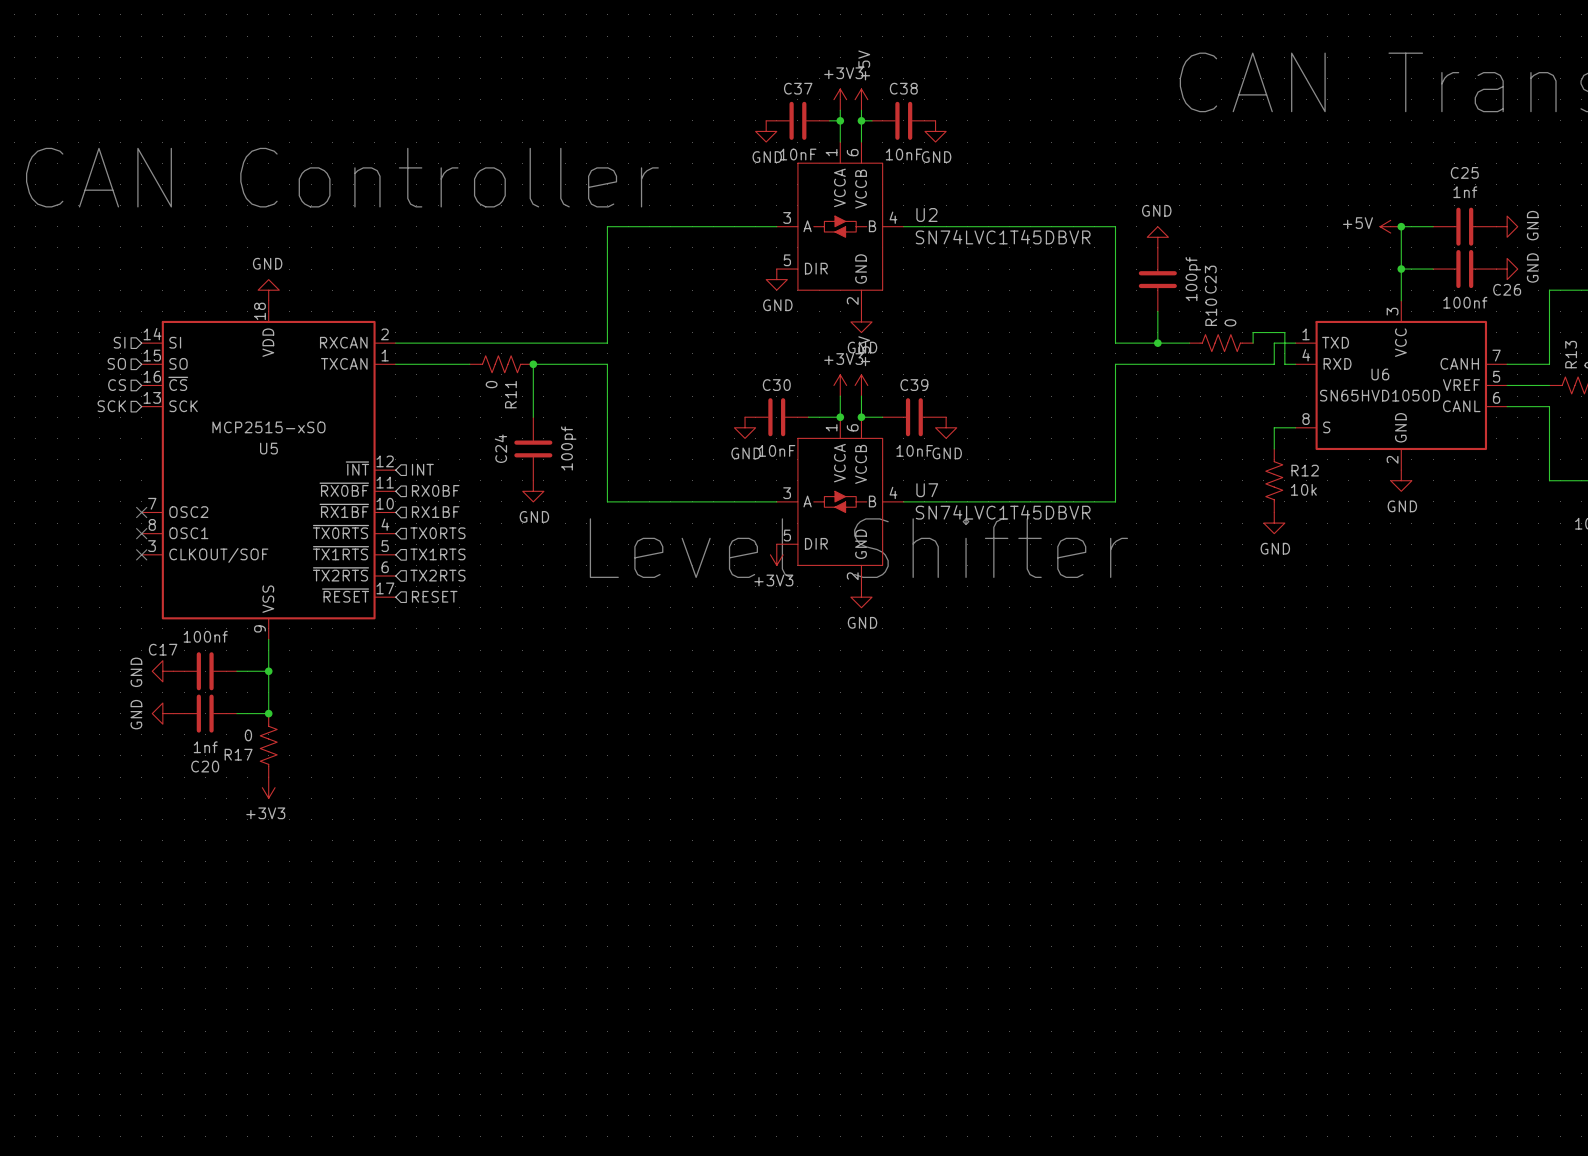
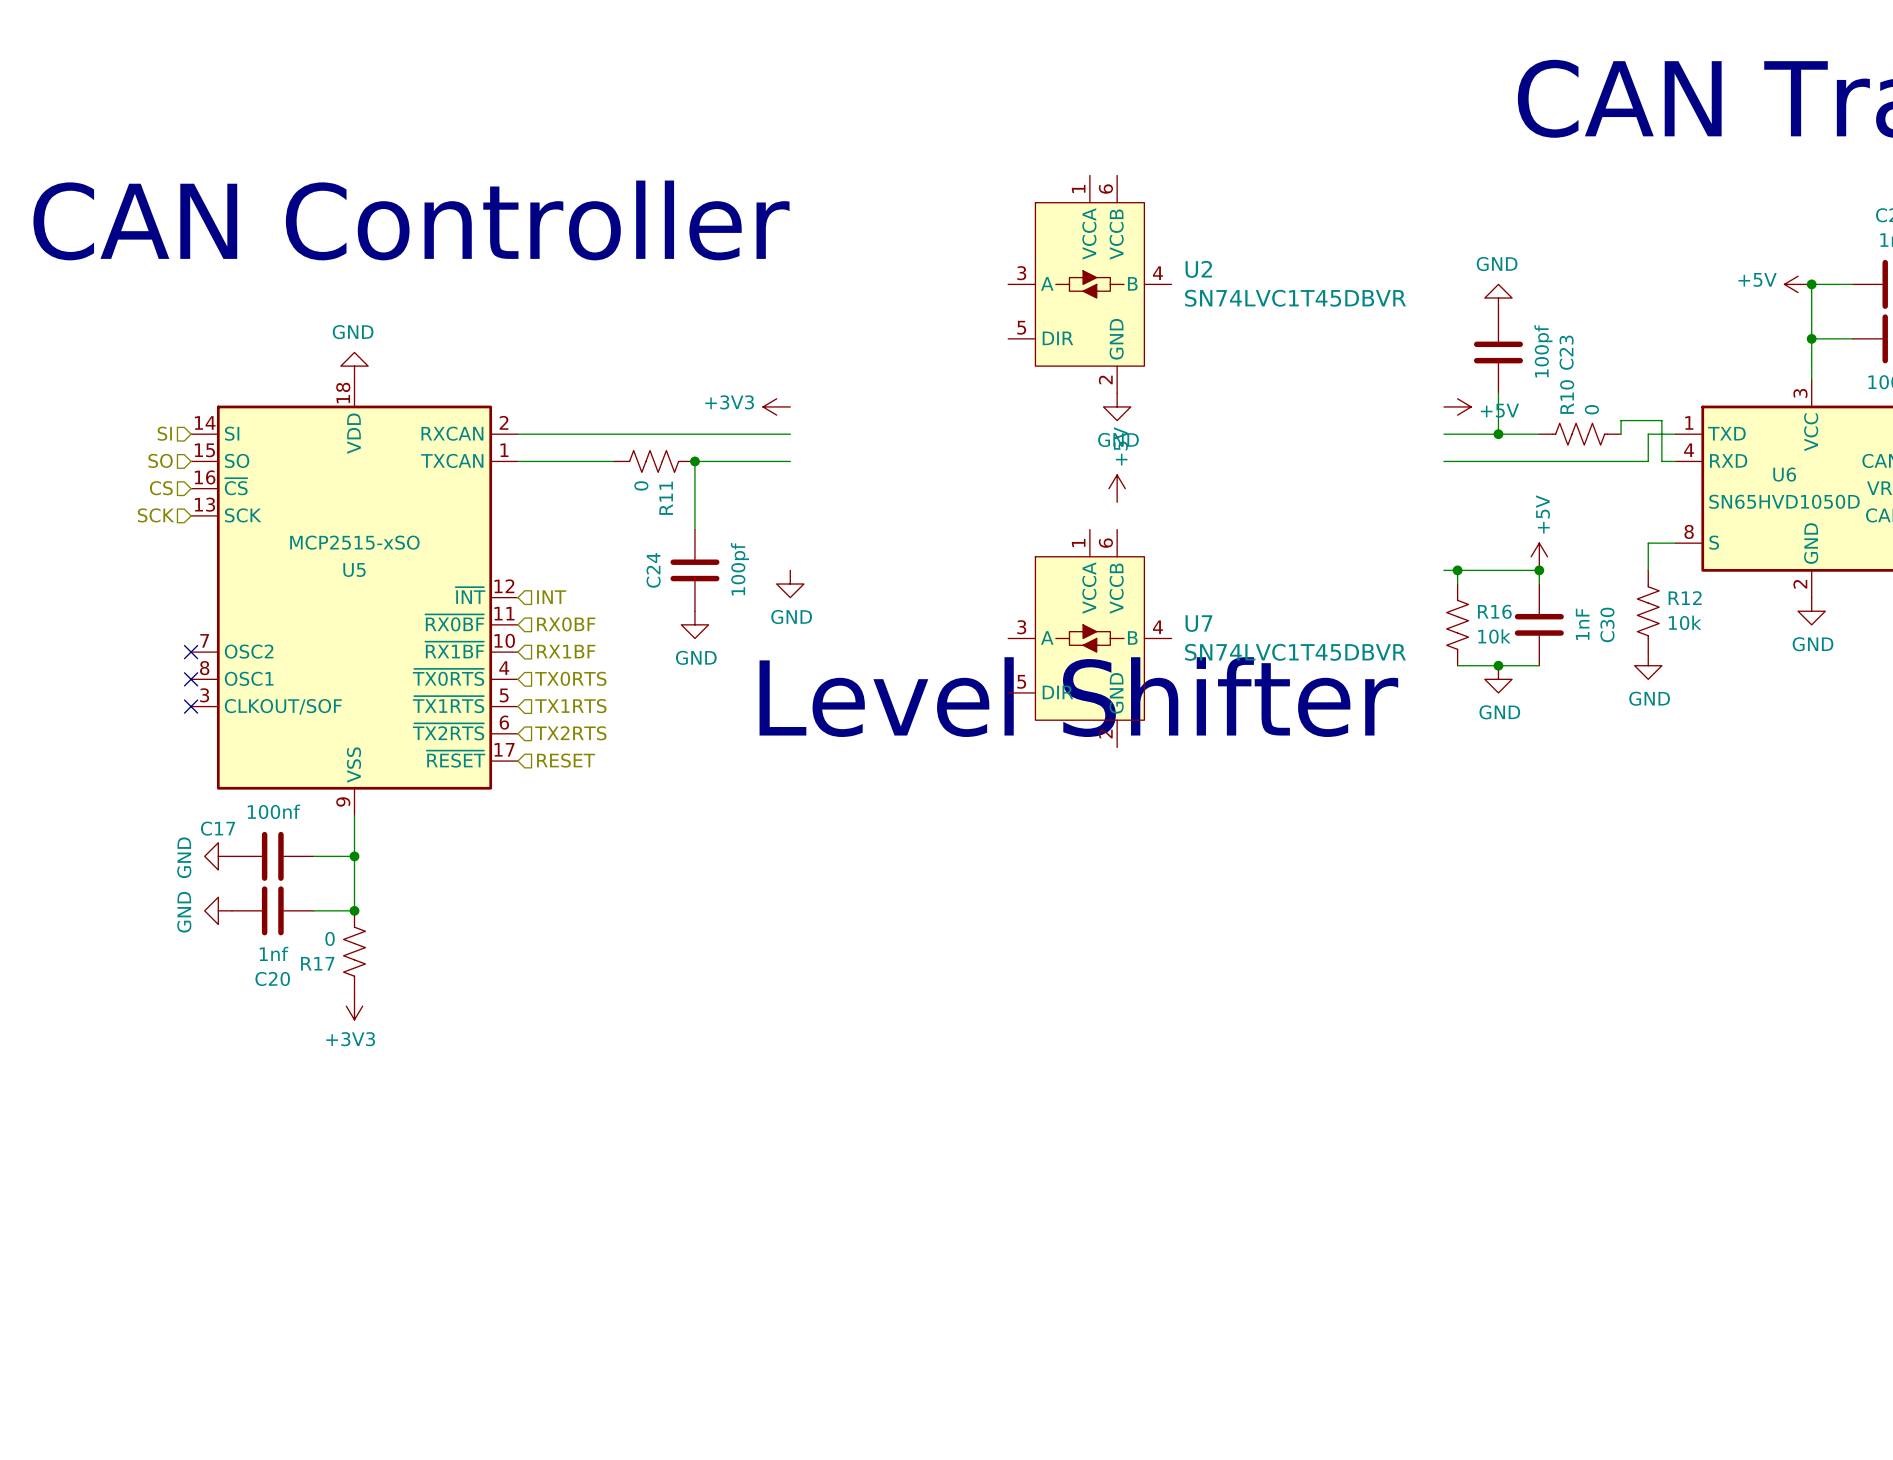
power symbol: +3V3 (840, 99) -> none
power symbol: +5V (861, 99) -> none
wire: (840, 110) (840, 142) -> none
wire: (861, 110) (861, 142) -> none
C37: 10nF (797, 120) -> none
wire: (829, 120) (840, 120) -> none
junction: (840, 120) -> none
wire: (861, 120) (872, 120) -> none
junction: (861, 120) -> none
C38: 10nF (903, 120) -> none
power symbol: GND (766, 131) -> none
power symbol: GND (935, 131) -> none
wire: (776, 226) (607, 226) (607, 343) -> none
wire: (903, 226) (1115, 226) (1115, 343) -> none
power symbol: GND (776, 279) -> none
power symbol: none -> +3V3 (776, 406)
power symbol: none -> +5V (1457, 406)
wire: (607, 364) (607, 501) (776, 501) -> none
wire: (1115, 364) (1115, 501) (903, 501) -> none
C30 name position: C30 (776, 385) -> C30 (1607, 624)
power symbol: +3V3 (840, 385) -> none
wire: (840, 396) (840, 417) (808, 417) -> none
wire: (861, 396) (861, 417) (882, 417) -> none
C30 rotation: 0° (776, 417) -> 90° clockwise (1539, 624)
C30 position: (776, 417) -> (1539, 624)
junction: (840, 417) -> none
junction: (861, 417) -> none
C39: 10nF (914, 417) -> none
power symbol: GND (745, 427) -> none
power symbol: GND (946, 427) -> none
power symbol: none -> +5V (1539, 556)
wire: none -> (1443, 570) (1539, 570) (1539, 584)
wire: none -> (1457, 570) (1457, 584)
junction: none -> (1457, 570)
junction: none -> (1539, 570)
C30 value: 10nF (777, 450) -> 1nF (1582, 624)
power symbol: none -> GND (790, 584)
R16: none -> 10k (1457, 624)
wire: none -> (1457, 665) (1539, 665)
junction: none -> (1498, 665)
power symbol: none -> GND (1498, 679)
power symbol: +3V3 (776, 554) -> none
power symbol: GND (861, 597) -> none

